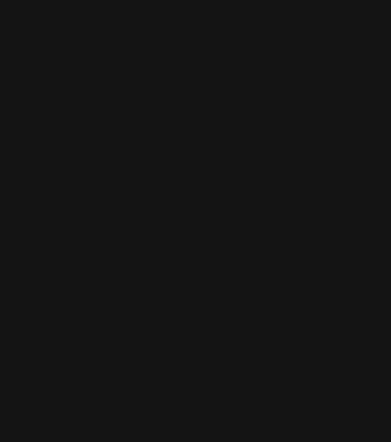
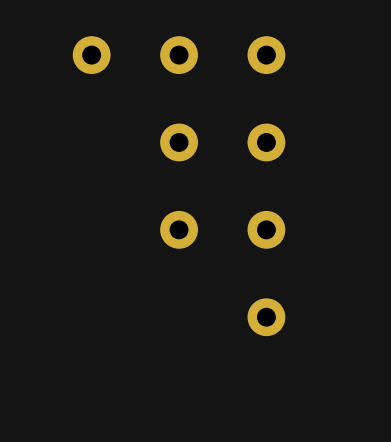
part: none -> (91, 55)
part: none -> (179, 55)
part: none -> (266, 55)
part: none -> (179, 142)
part: none -> (266, 142)
part: none -> (179, 229)
part: none -> (266, 229)
part: none -> (266, 317)

